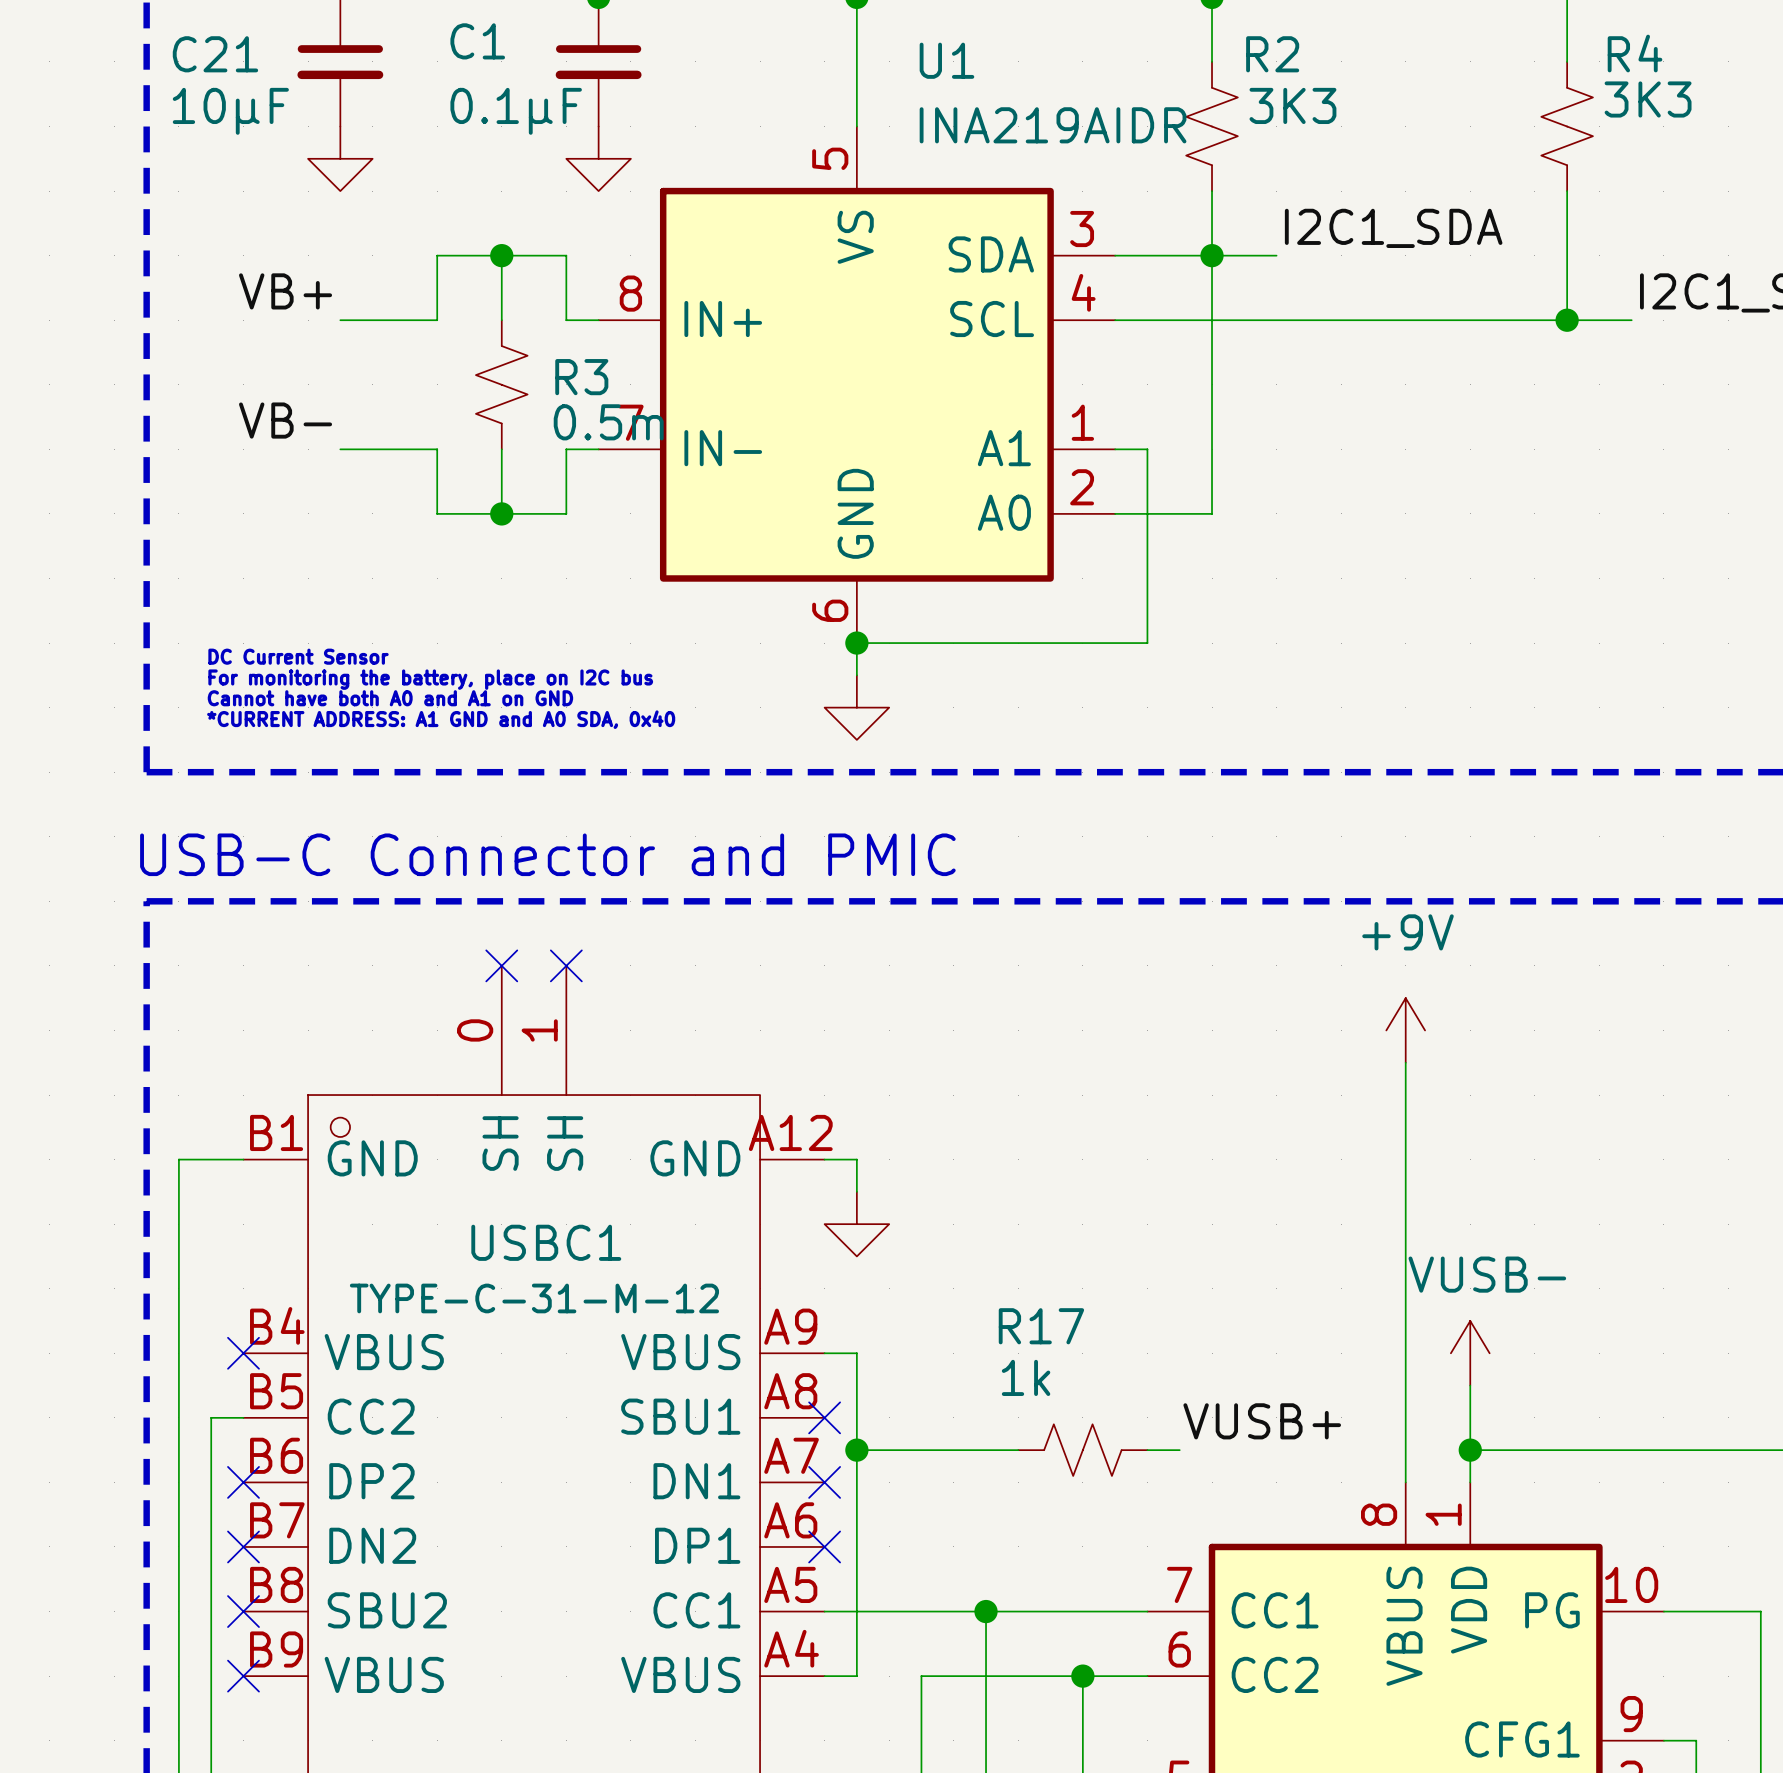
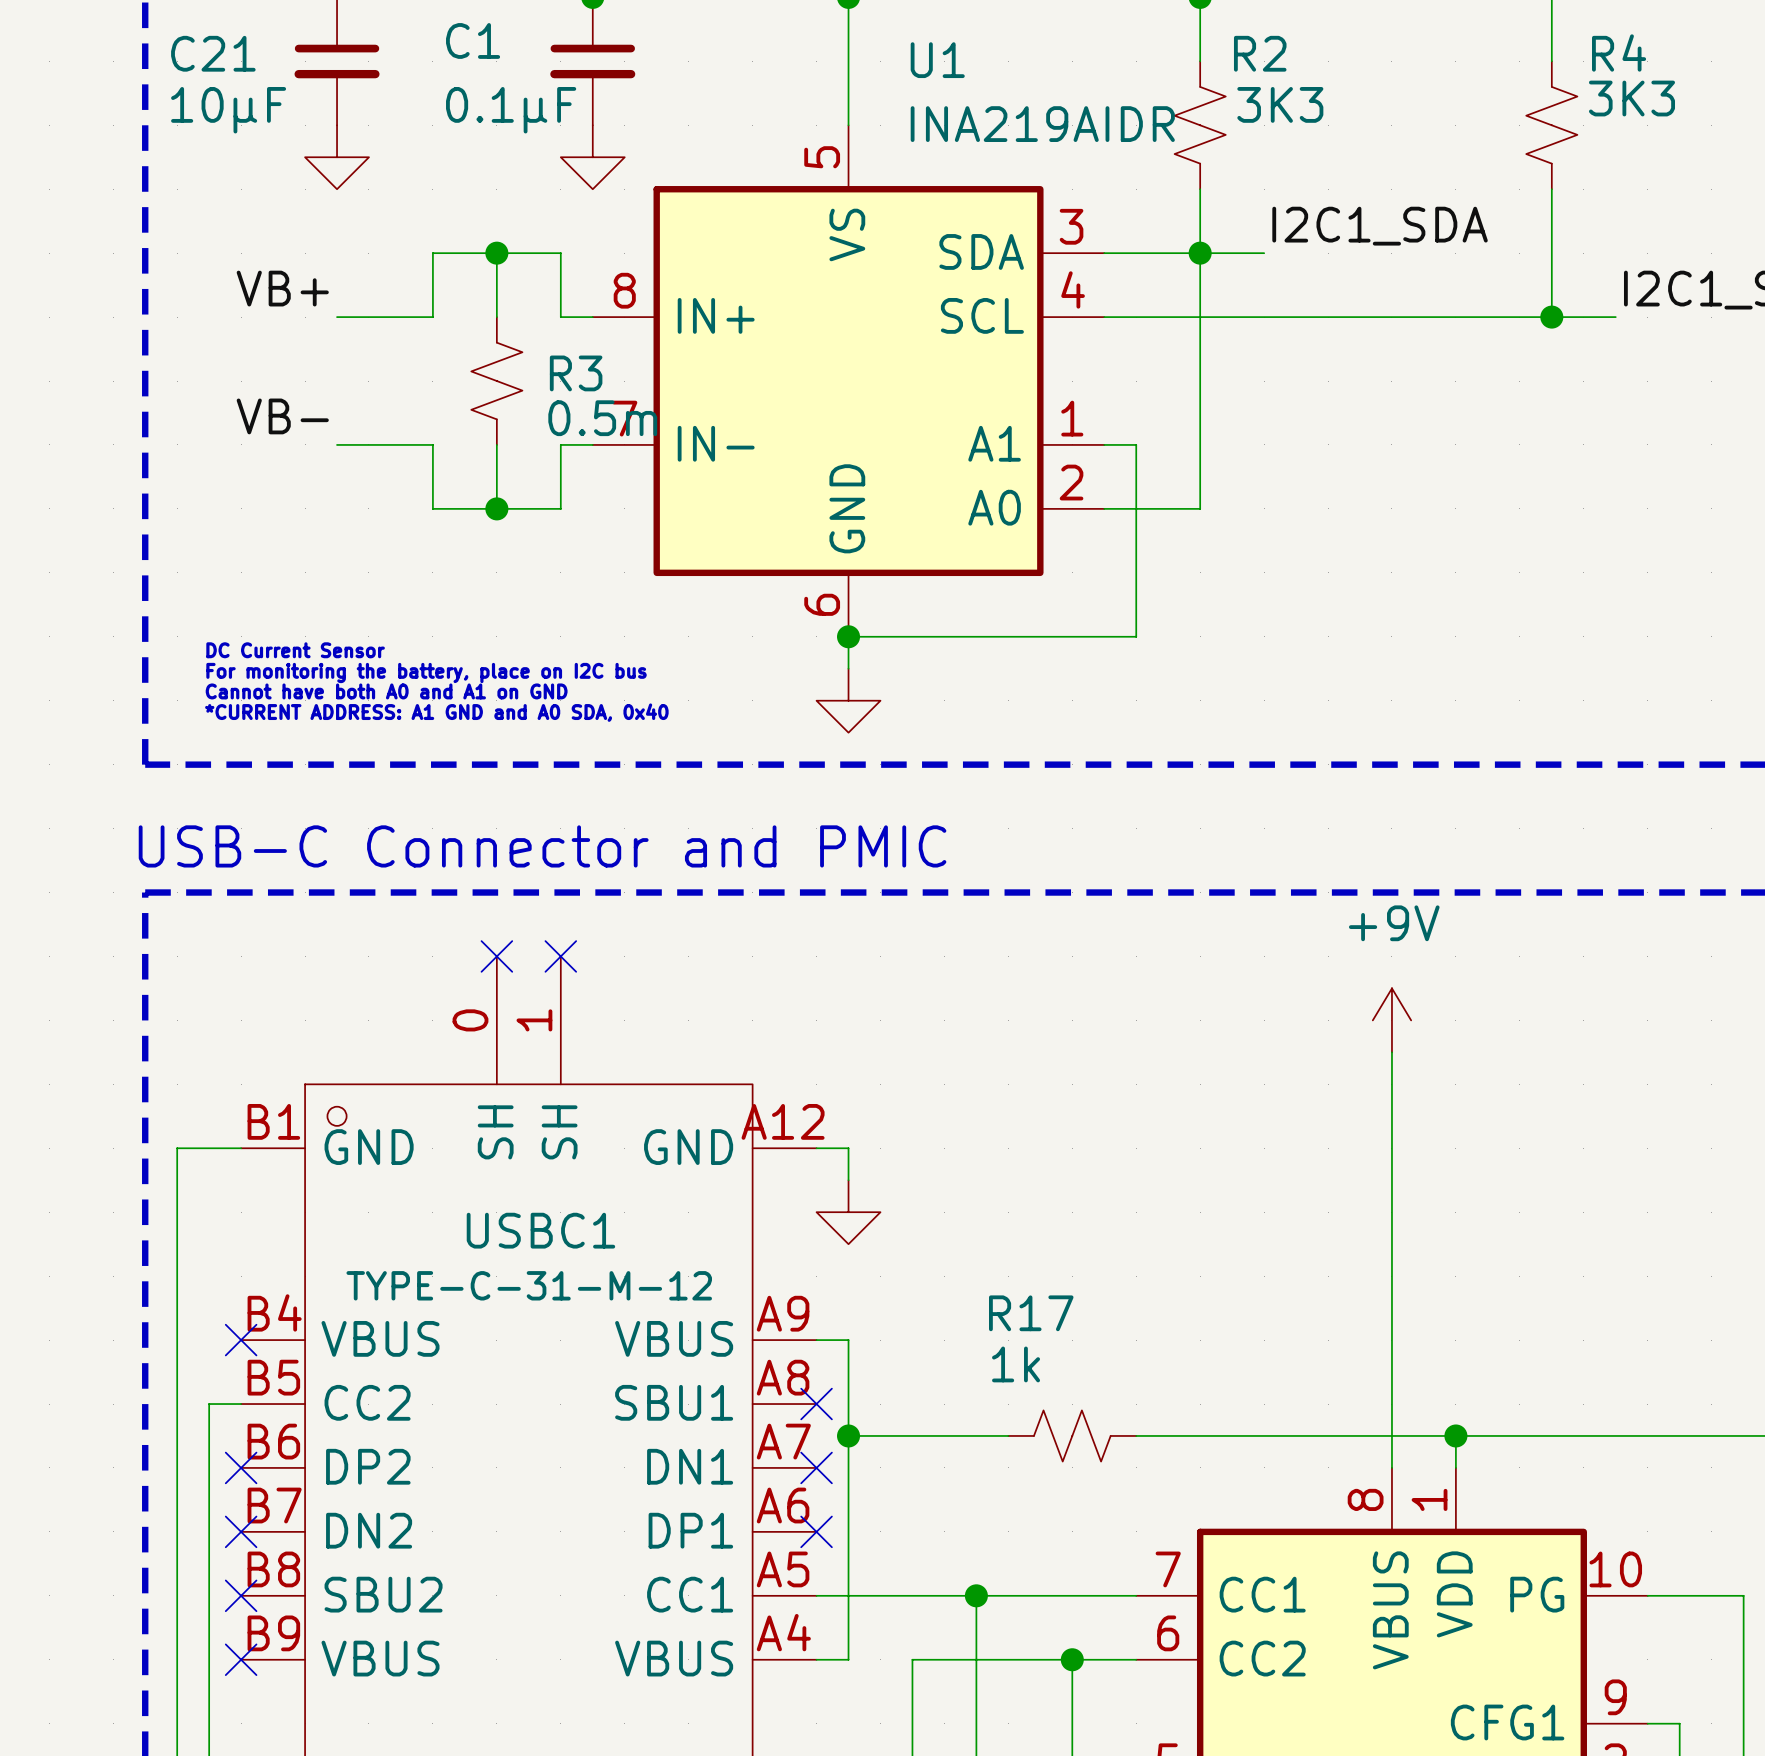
power symbol: VUSB- (1470, 1353) -> none
wire: (1470, 1385) (1470, 1450) -> (1168, 1435) (1455, 1435)
label: VUSB+ (1262, 1421) -> none

